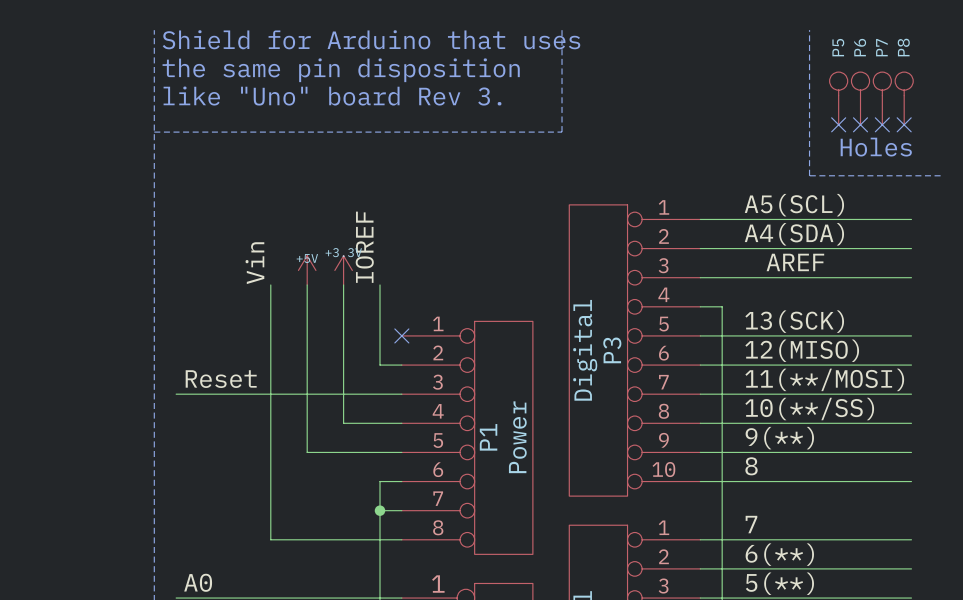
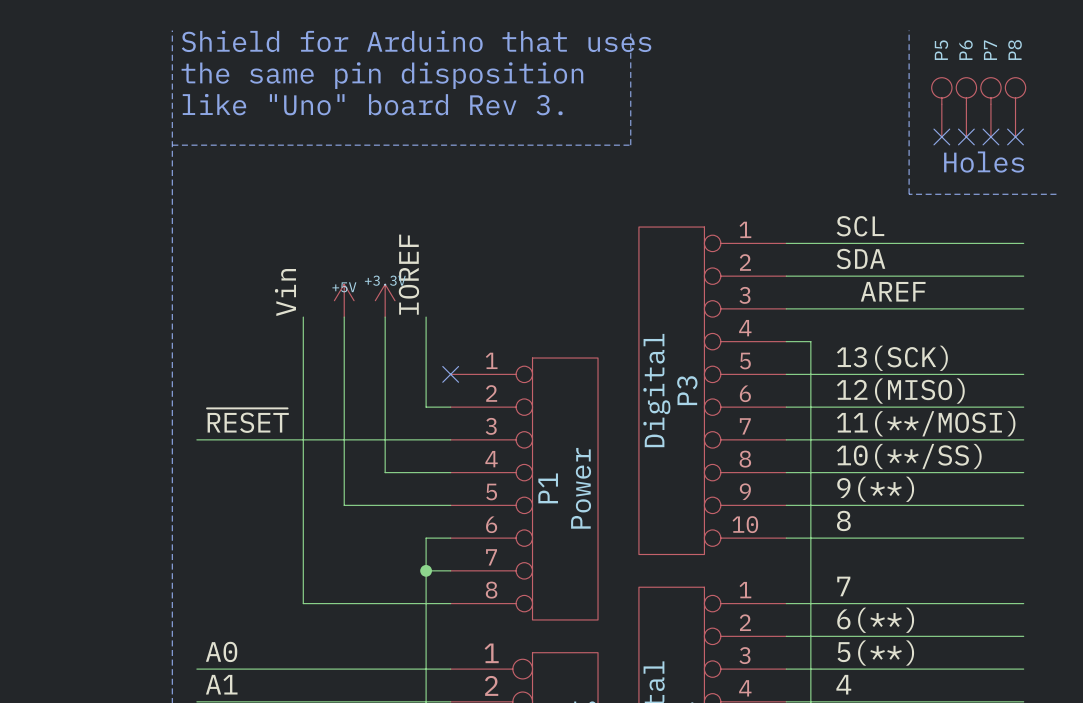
label: A5(SCL) (794, 205) -> SCL (860, 226)
label: A4(SDA) (794, 234) -> SDA (860, 259)
label: Reset (221, 379) -> ~{RESET} (247, 420)

